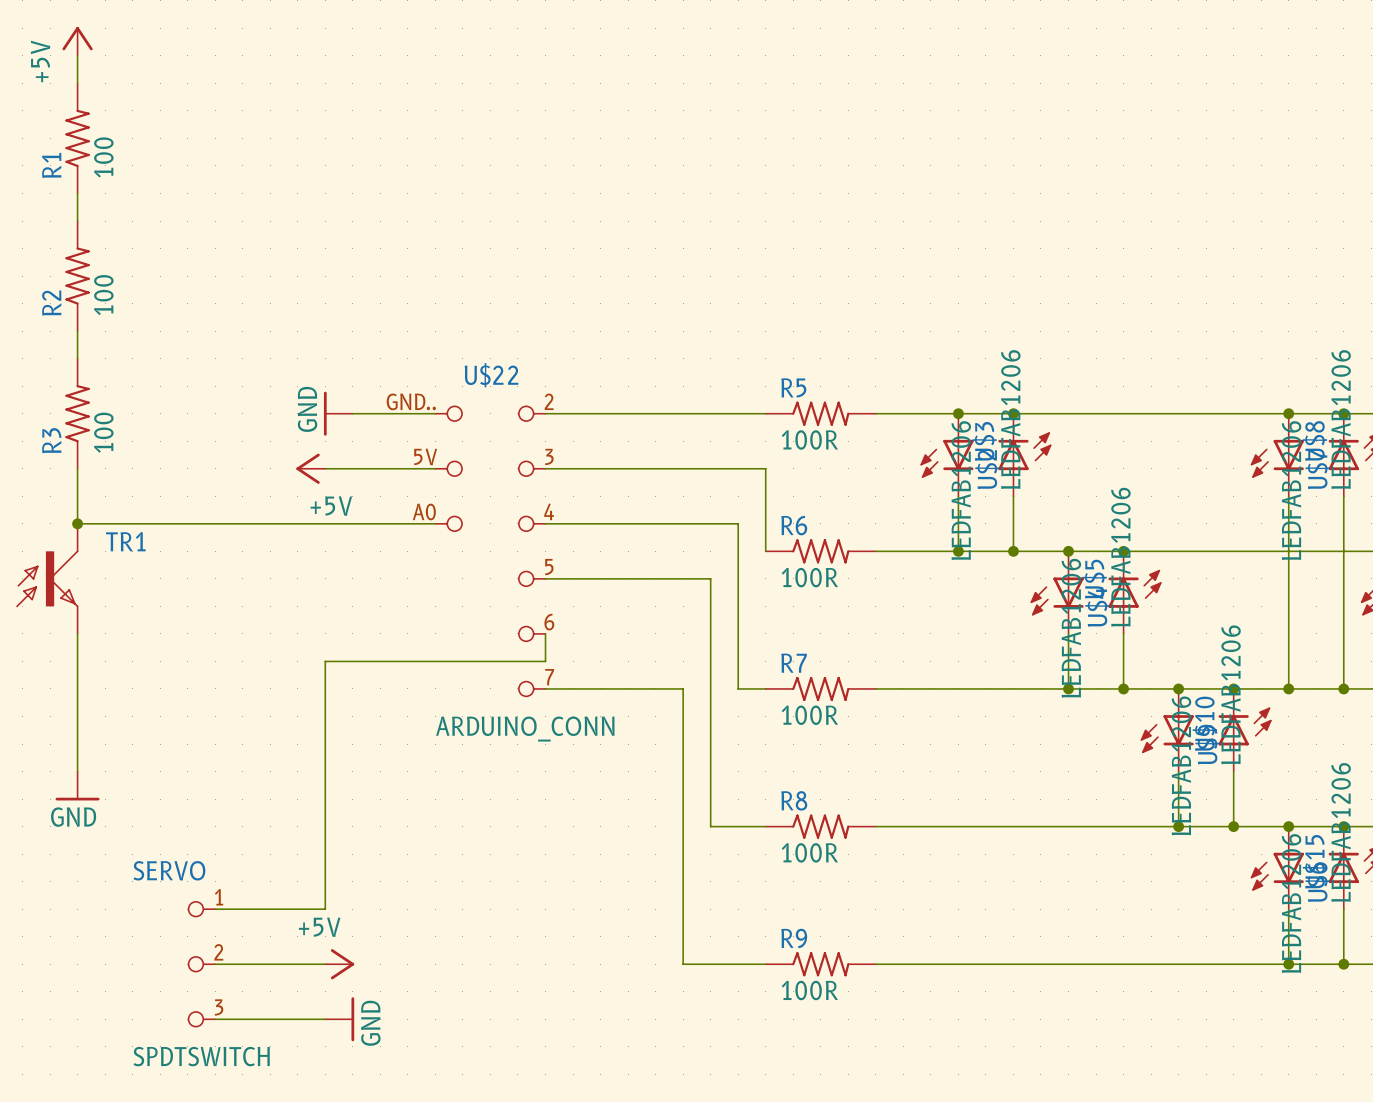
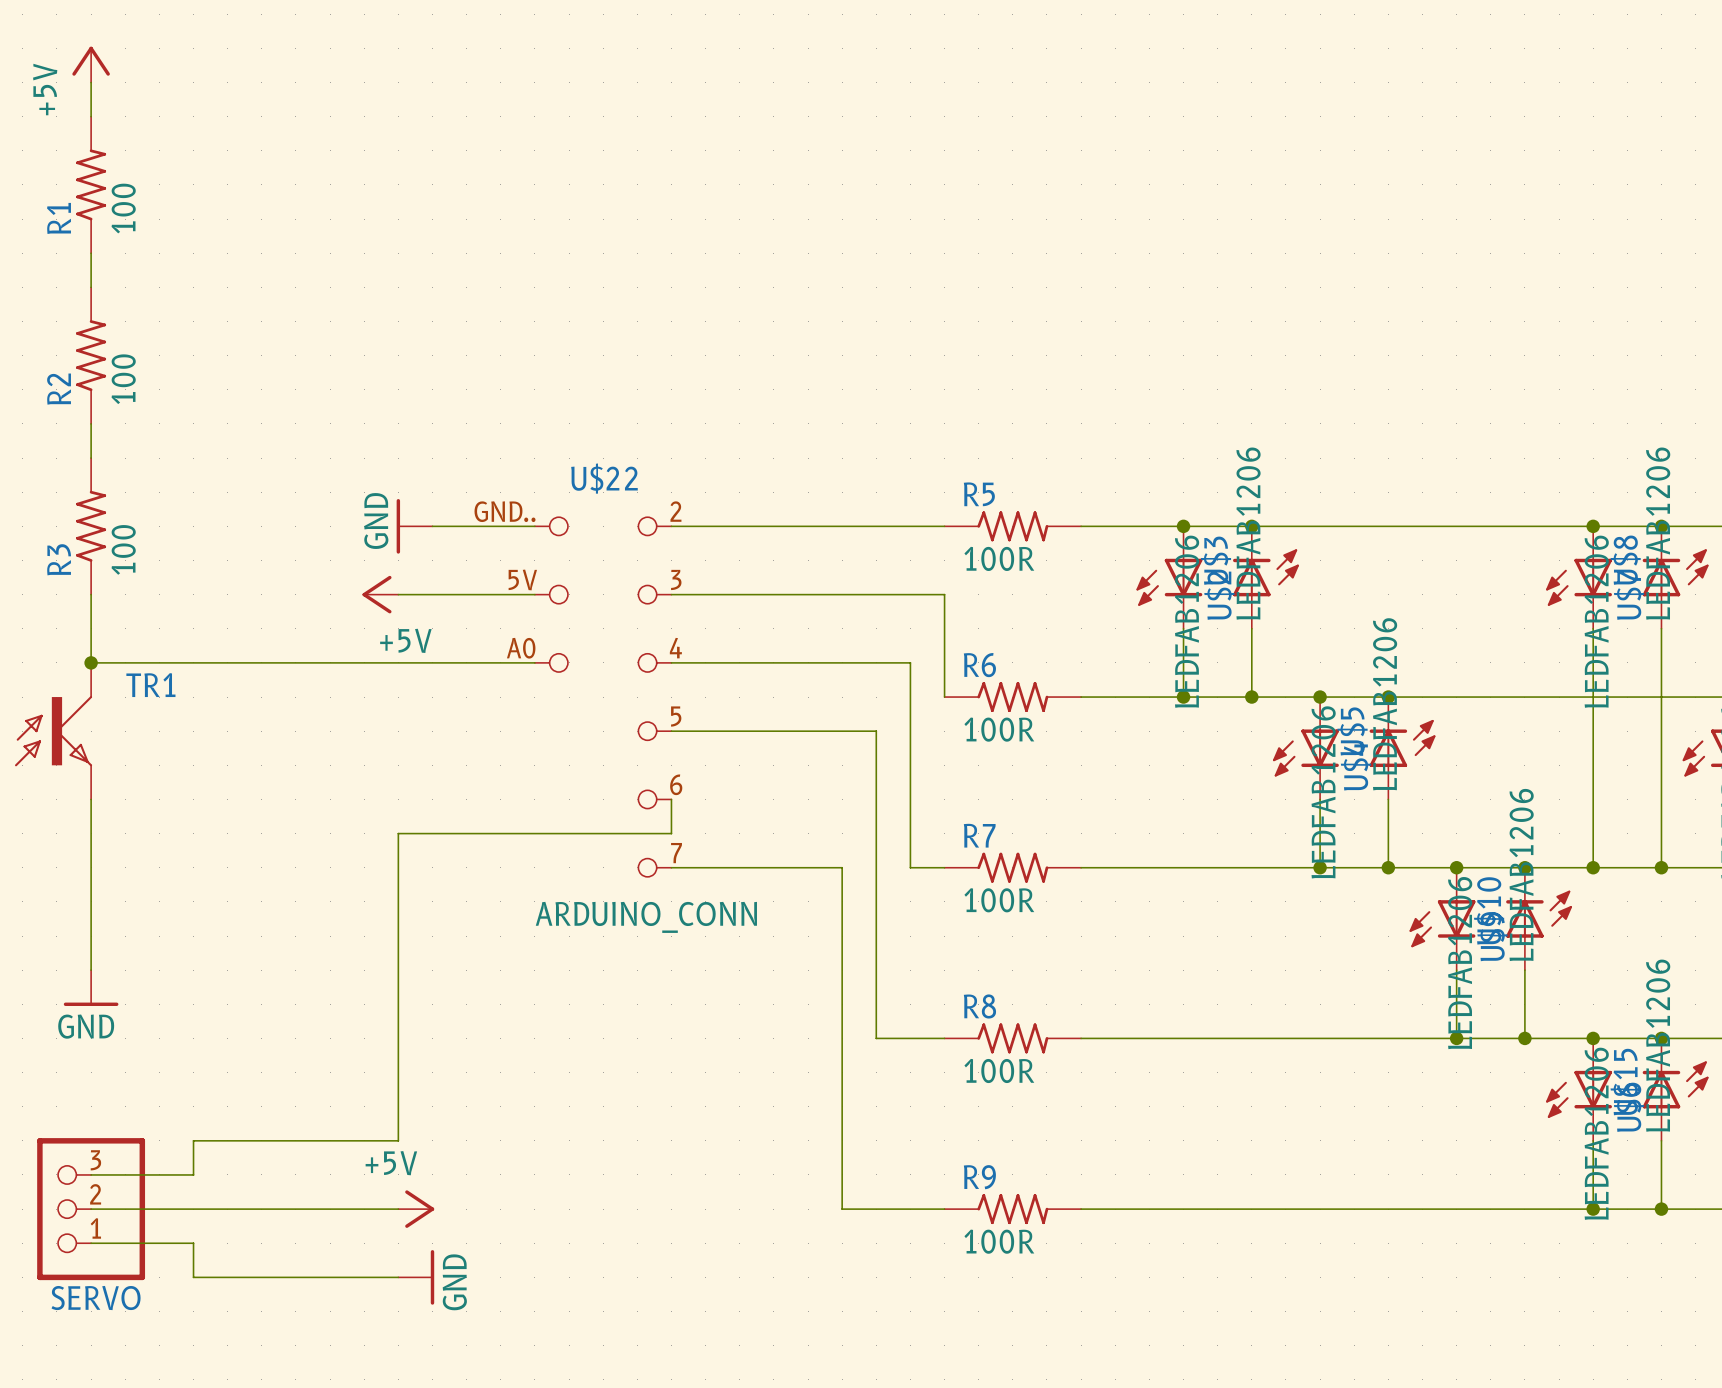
wire: none -> (261, 1140) (193, 1140) (193, 1174) (91, 1174)
wire: none -> (91, 1209) (261, 1209)
SERVO: none -> (91, 1209)
SERVO: SPDTSWITCH (201, 964) -> none
wire: none -> (91, 1243) (193, 1243) (193, 1277) (261, 1277)

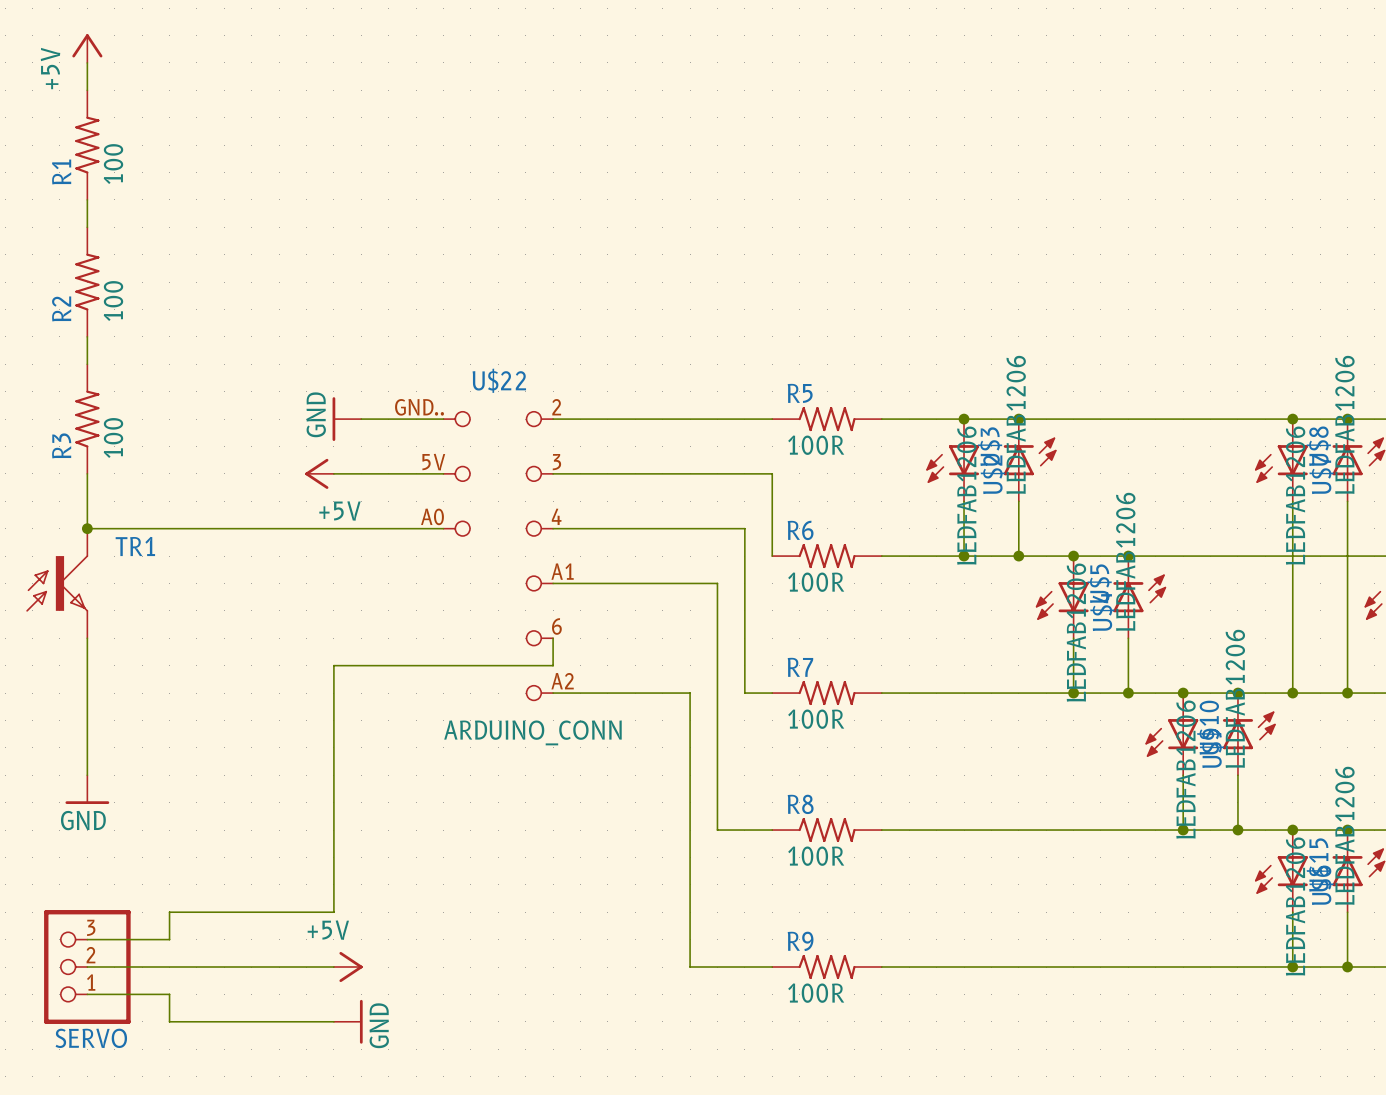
U$22 pin number: 5 (676, 716) -> A1 (562, 571)
U$22 pin number: 7 (676, 853) -> A2 (562, 681)

